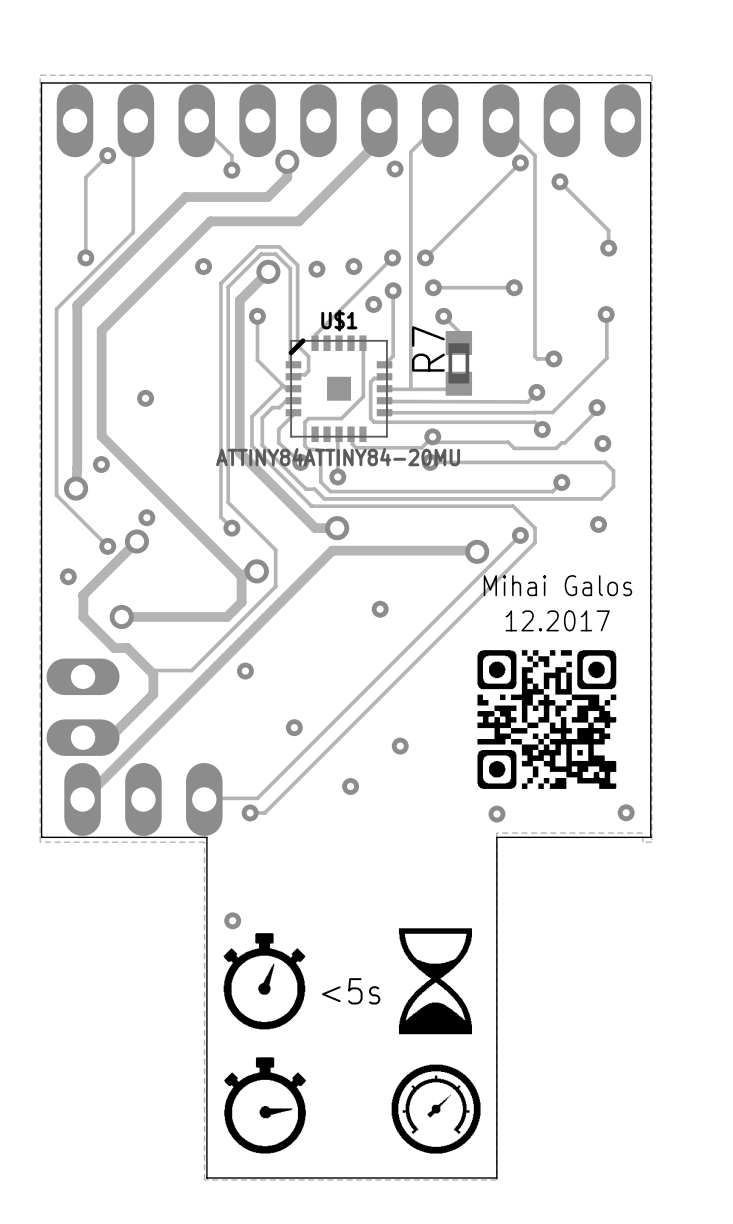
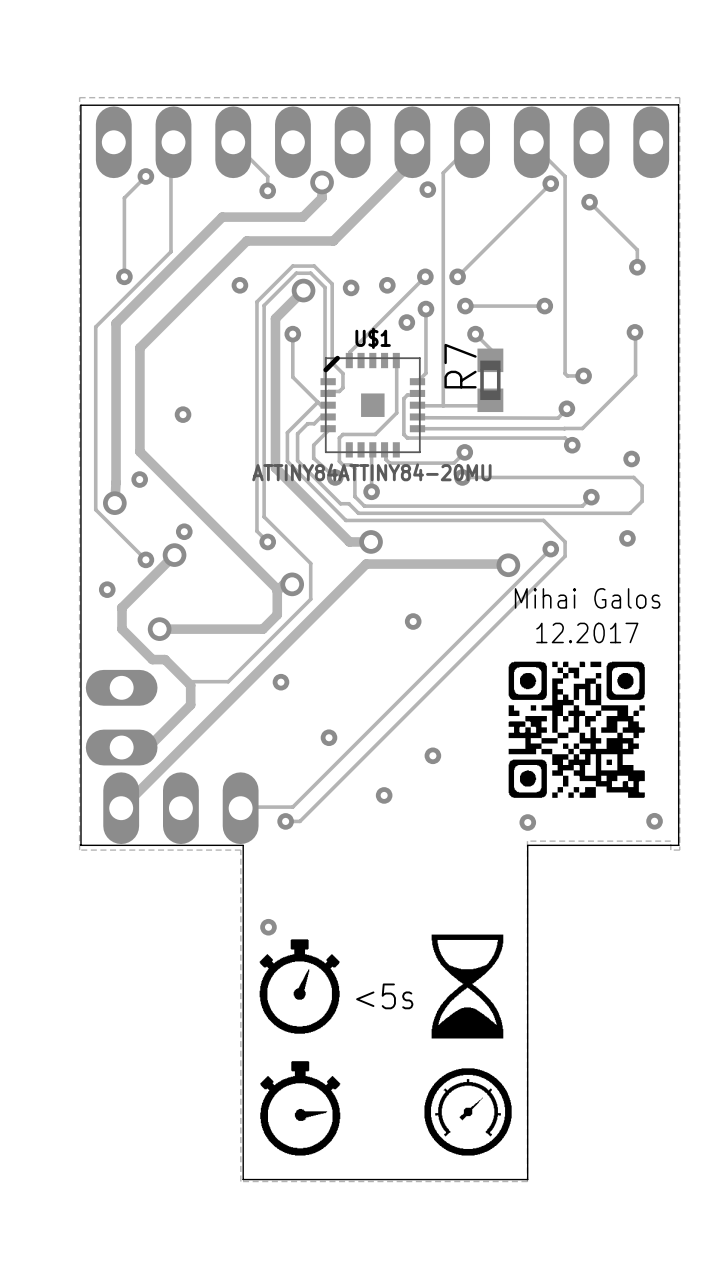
track: (597, 407) (597, 410) (564, 442) (561, 442) (556, 448) (514, 448) (508, 442) (438, 442) (432, 436) -> none
via: (597, 407) -> none

